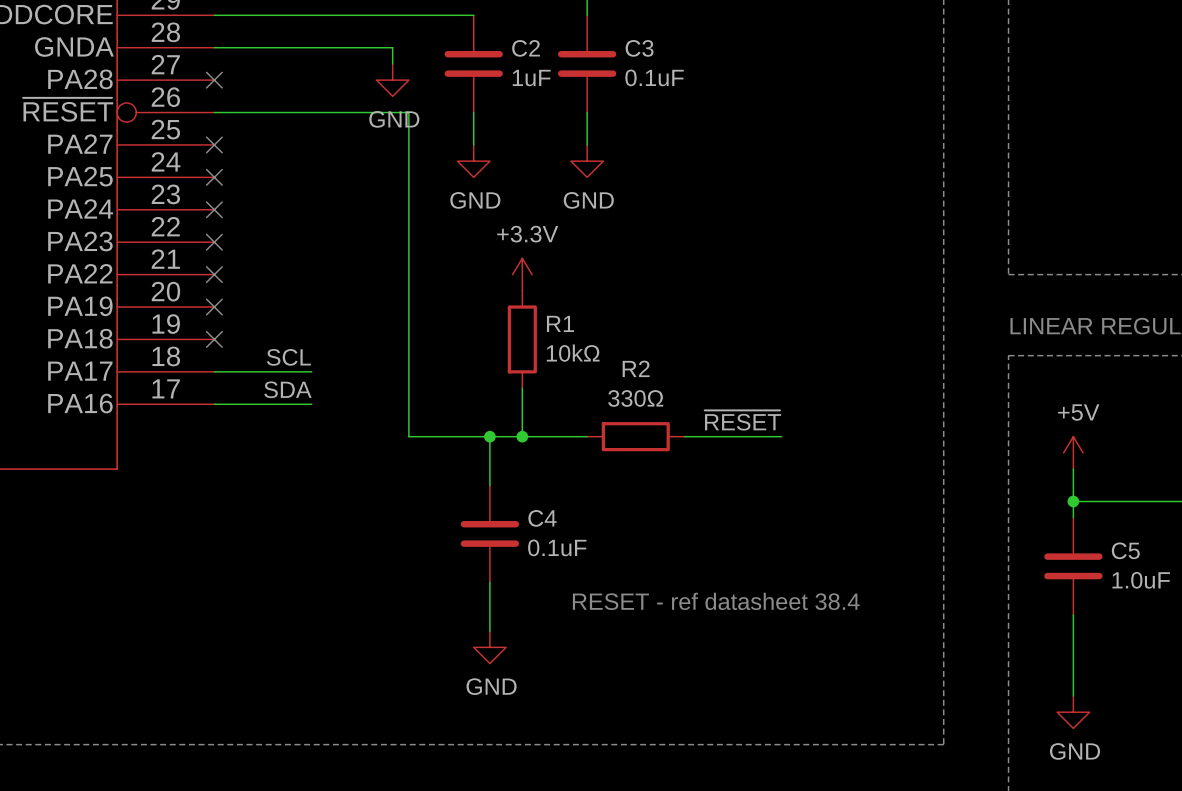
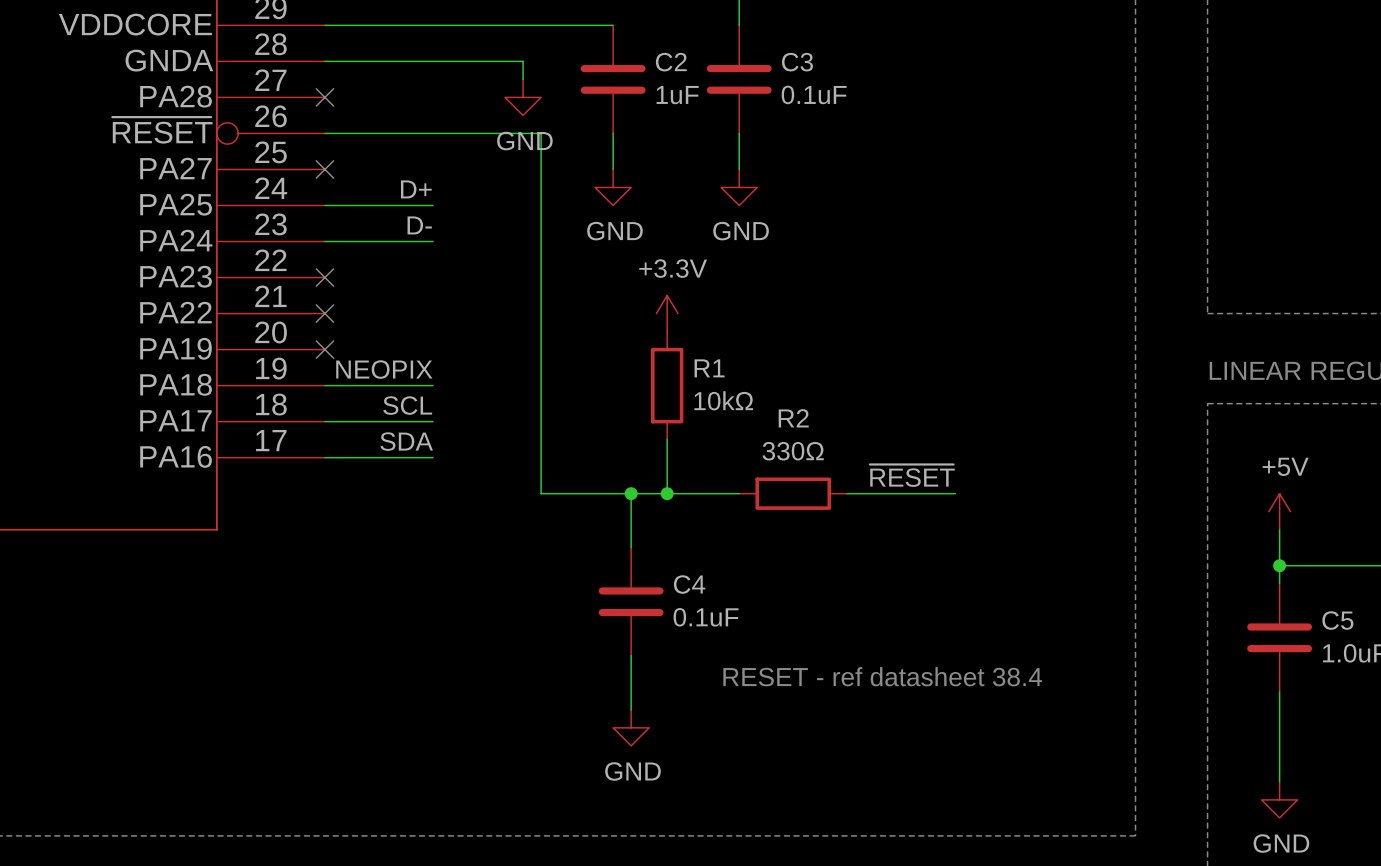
label: none -> D+ (416, 189)
wire: none -> (324, 205) (433, 205)
no-connect mark: (214, 177) -> none
label: none -> D- (419, 225)
wire: none -> (324, 241) (433, 241)
no-connect mark: (214, 209) -> none
label: none -> NEOPIX (384, 369)
wire: none -> (324, 385) (433, 385)
no-connect mark: (214, 339) -> none

